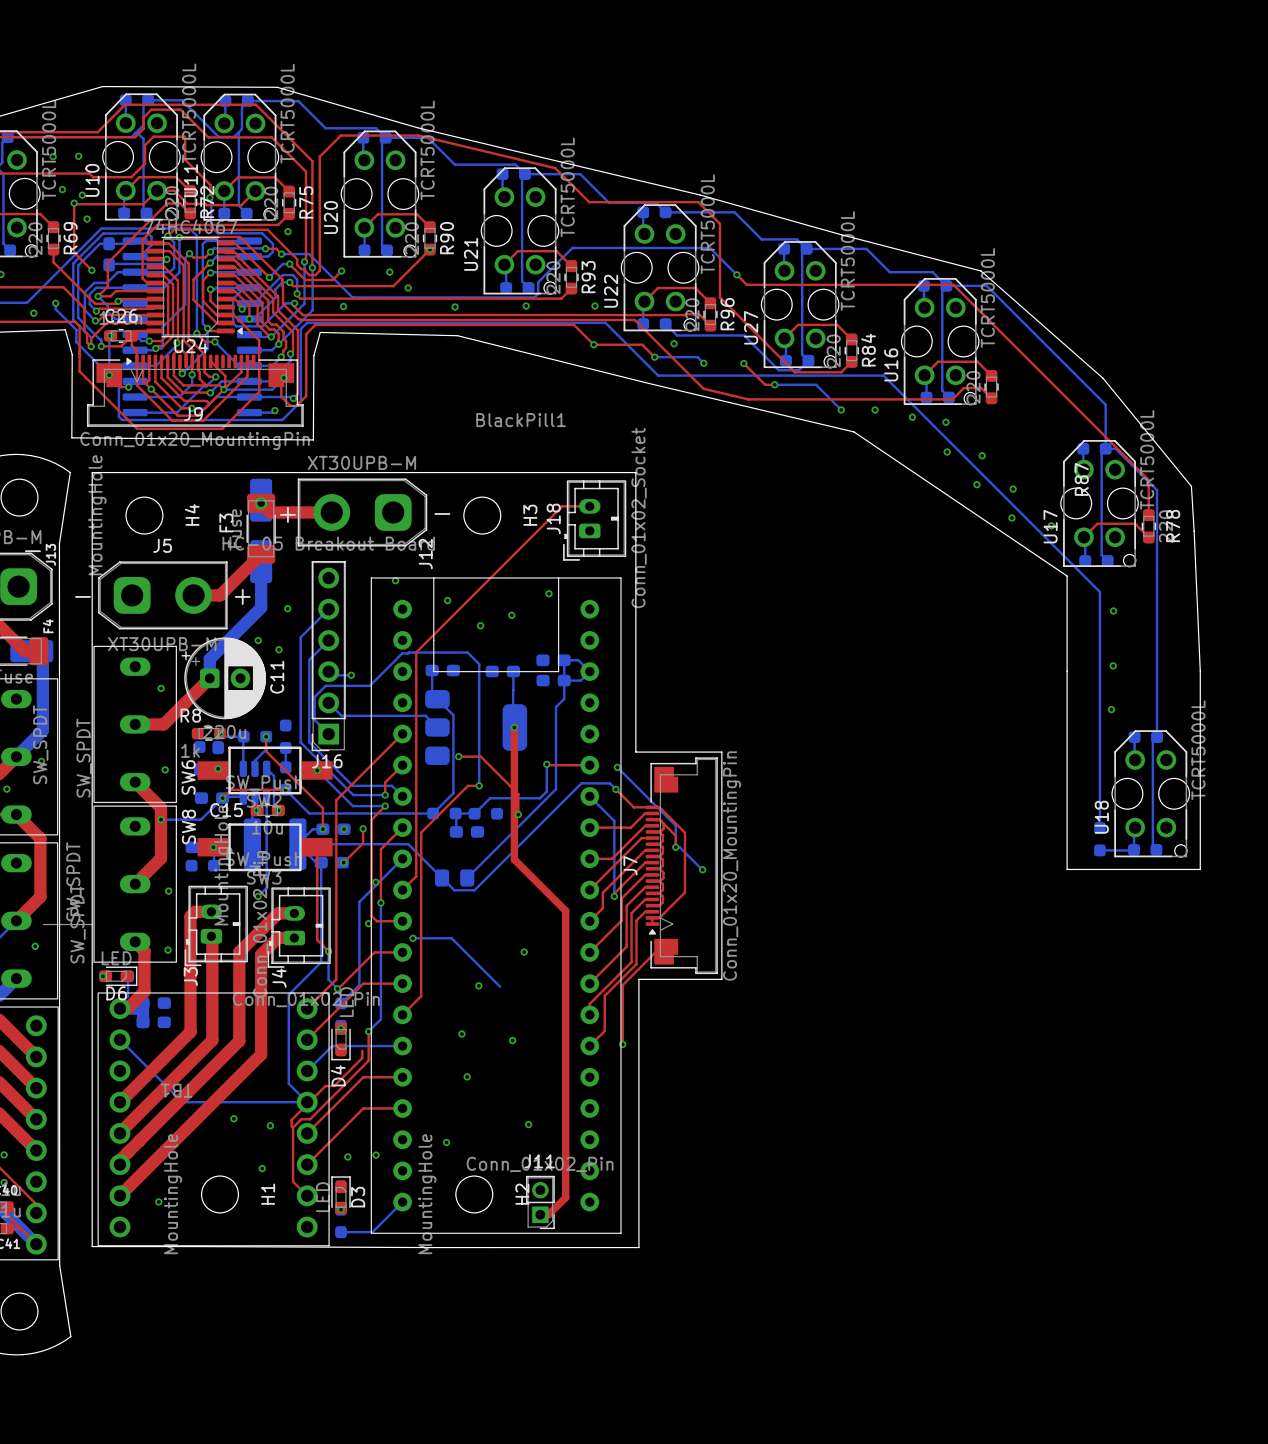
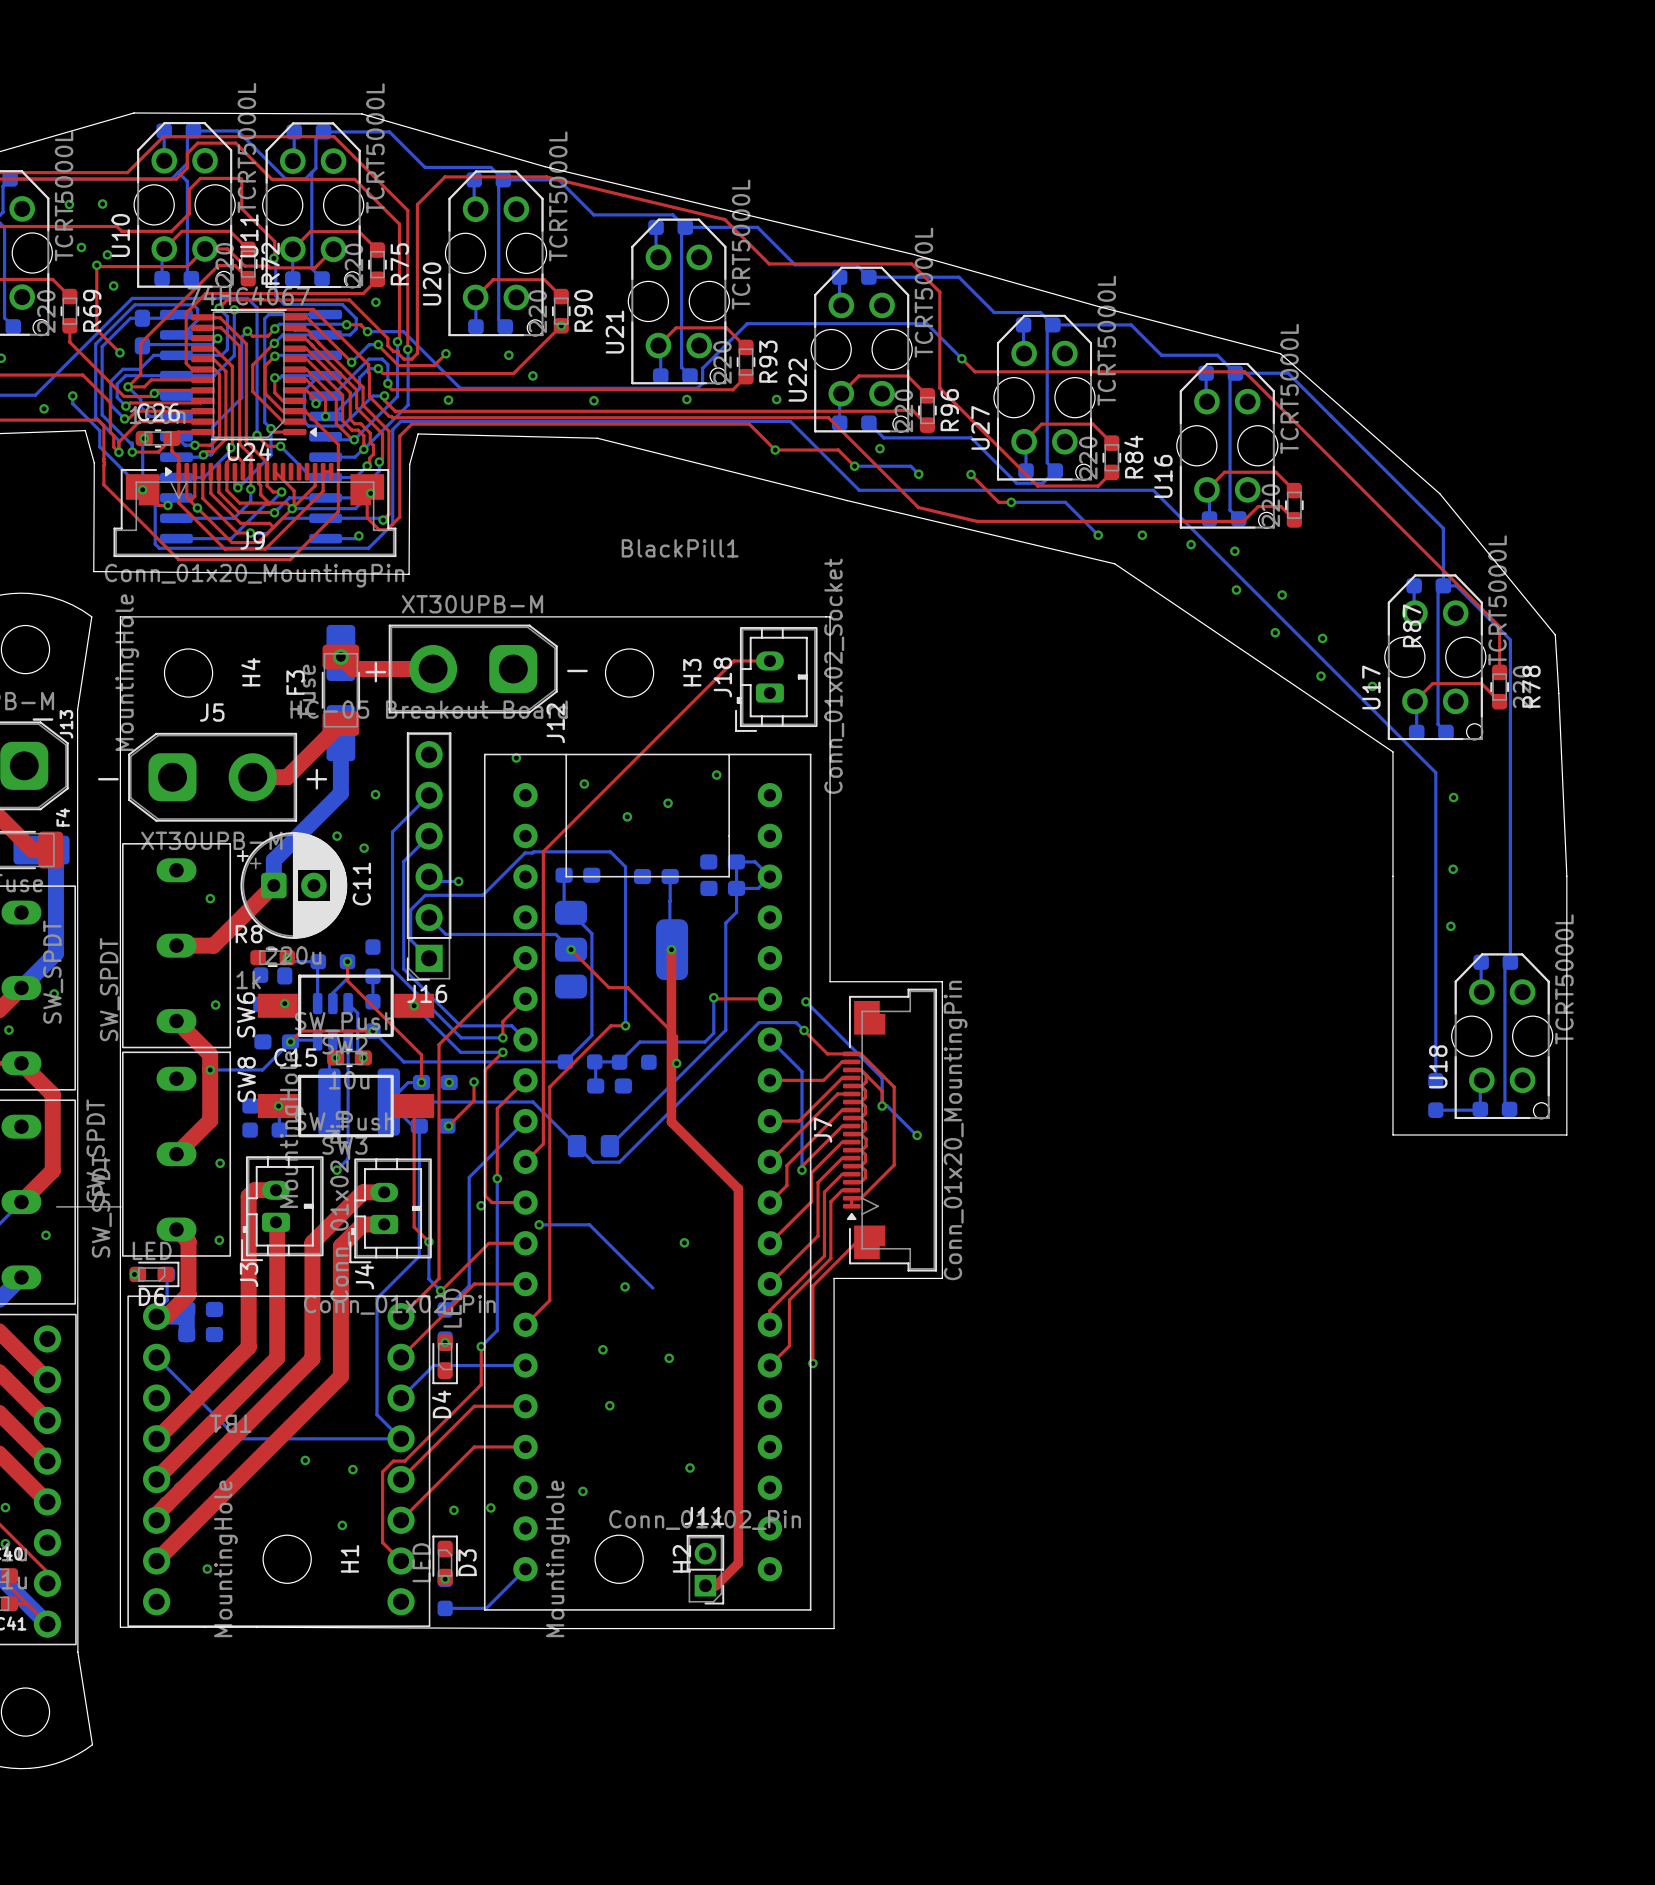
top track: (458, 756) (466, 756) -> (571, 949) (609, 987)
via position: (458, 756) -> (571, 949)
via: (375, 882) -> none
top track: (362, 1050) (362, 1058) (334, 1086) (325, 1086) (291, 1119) (291, 1126) -> none

